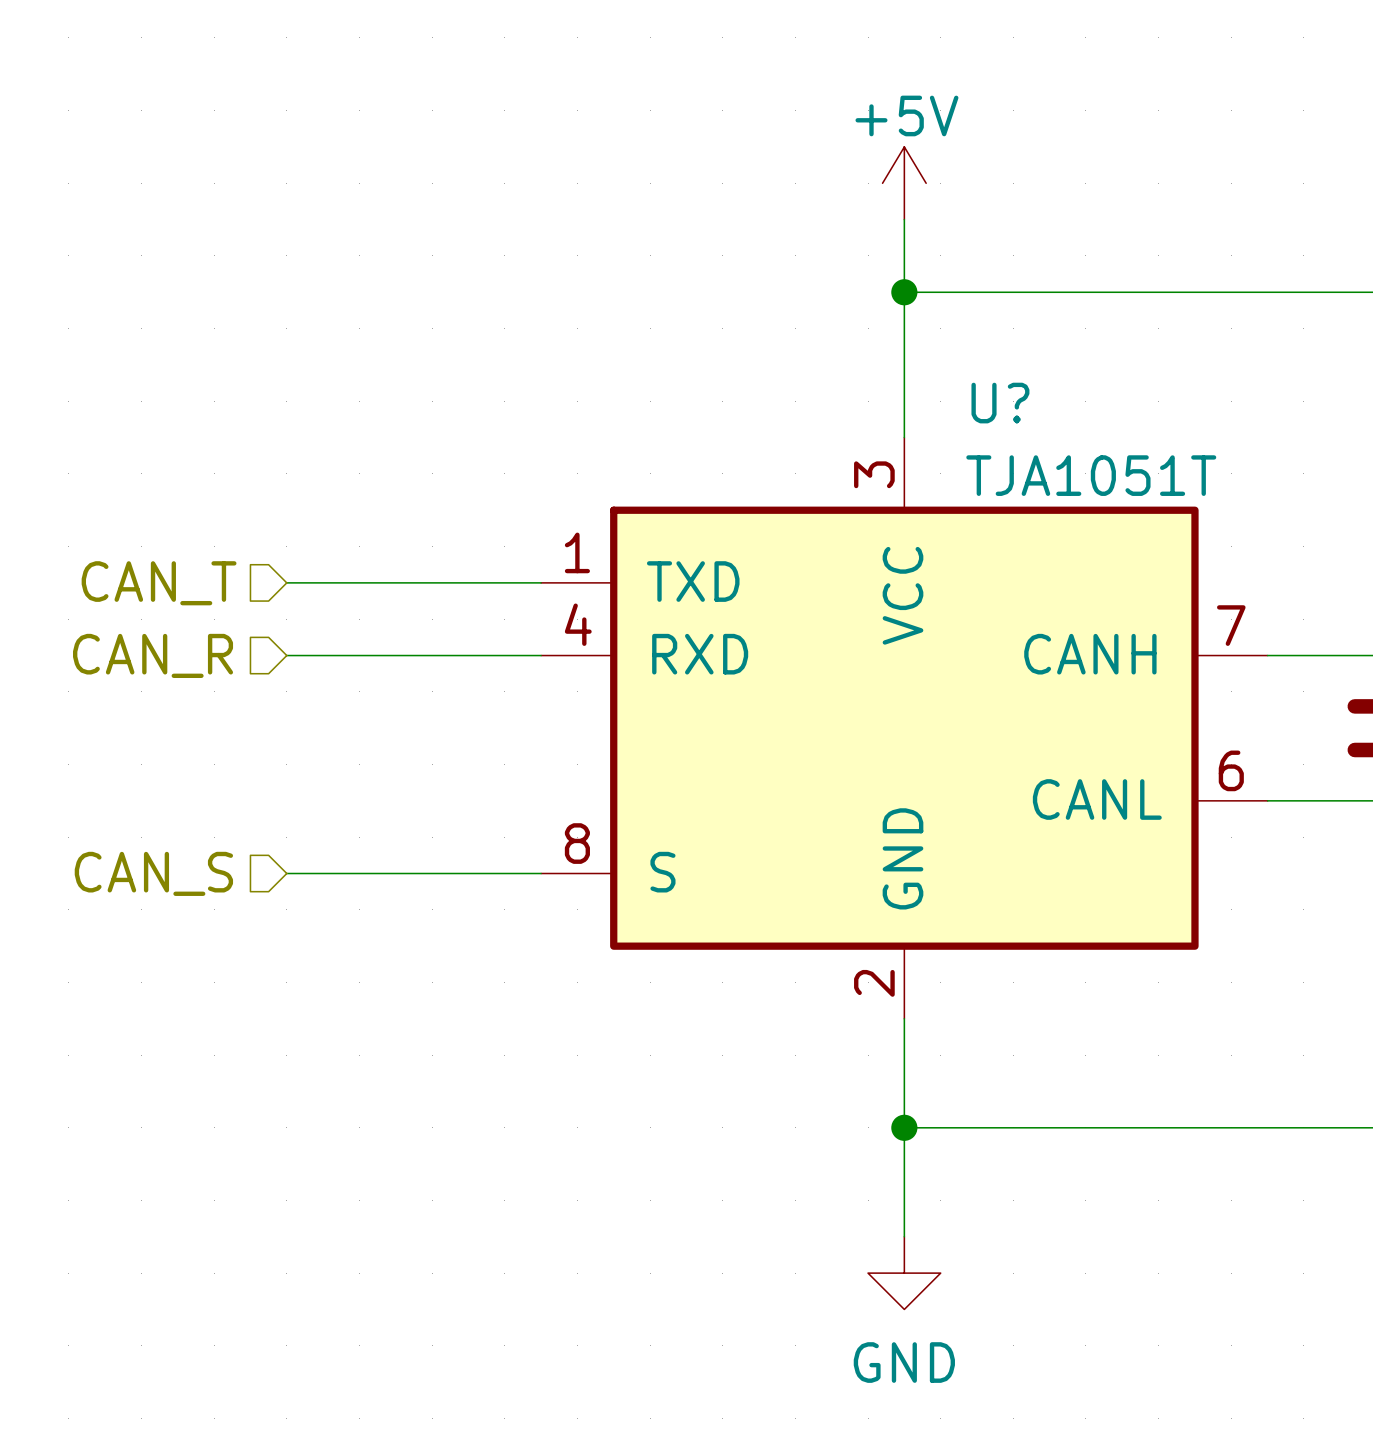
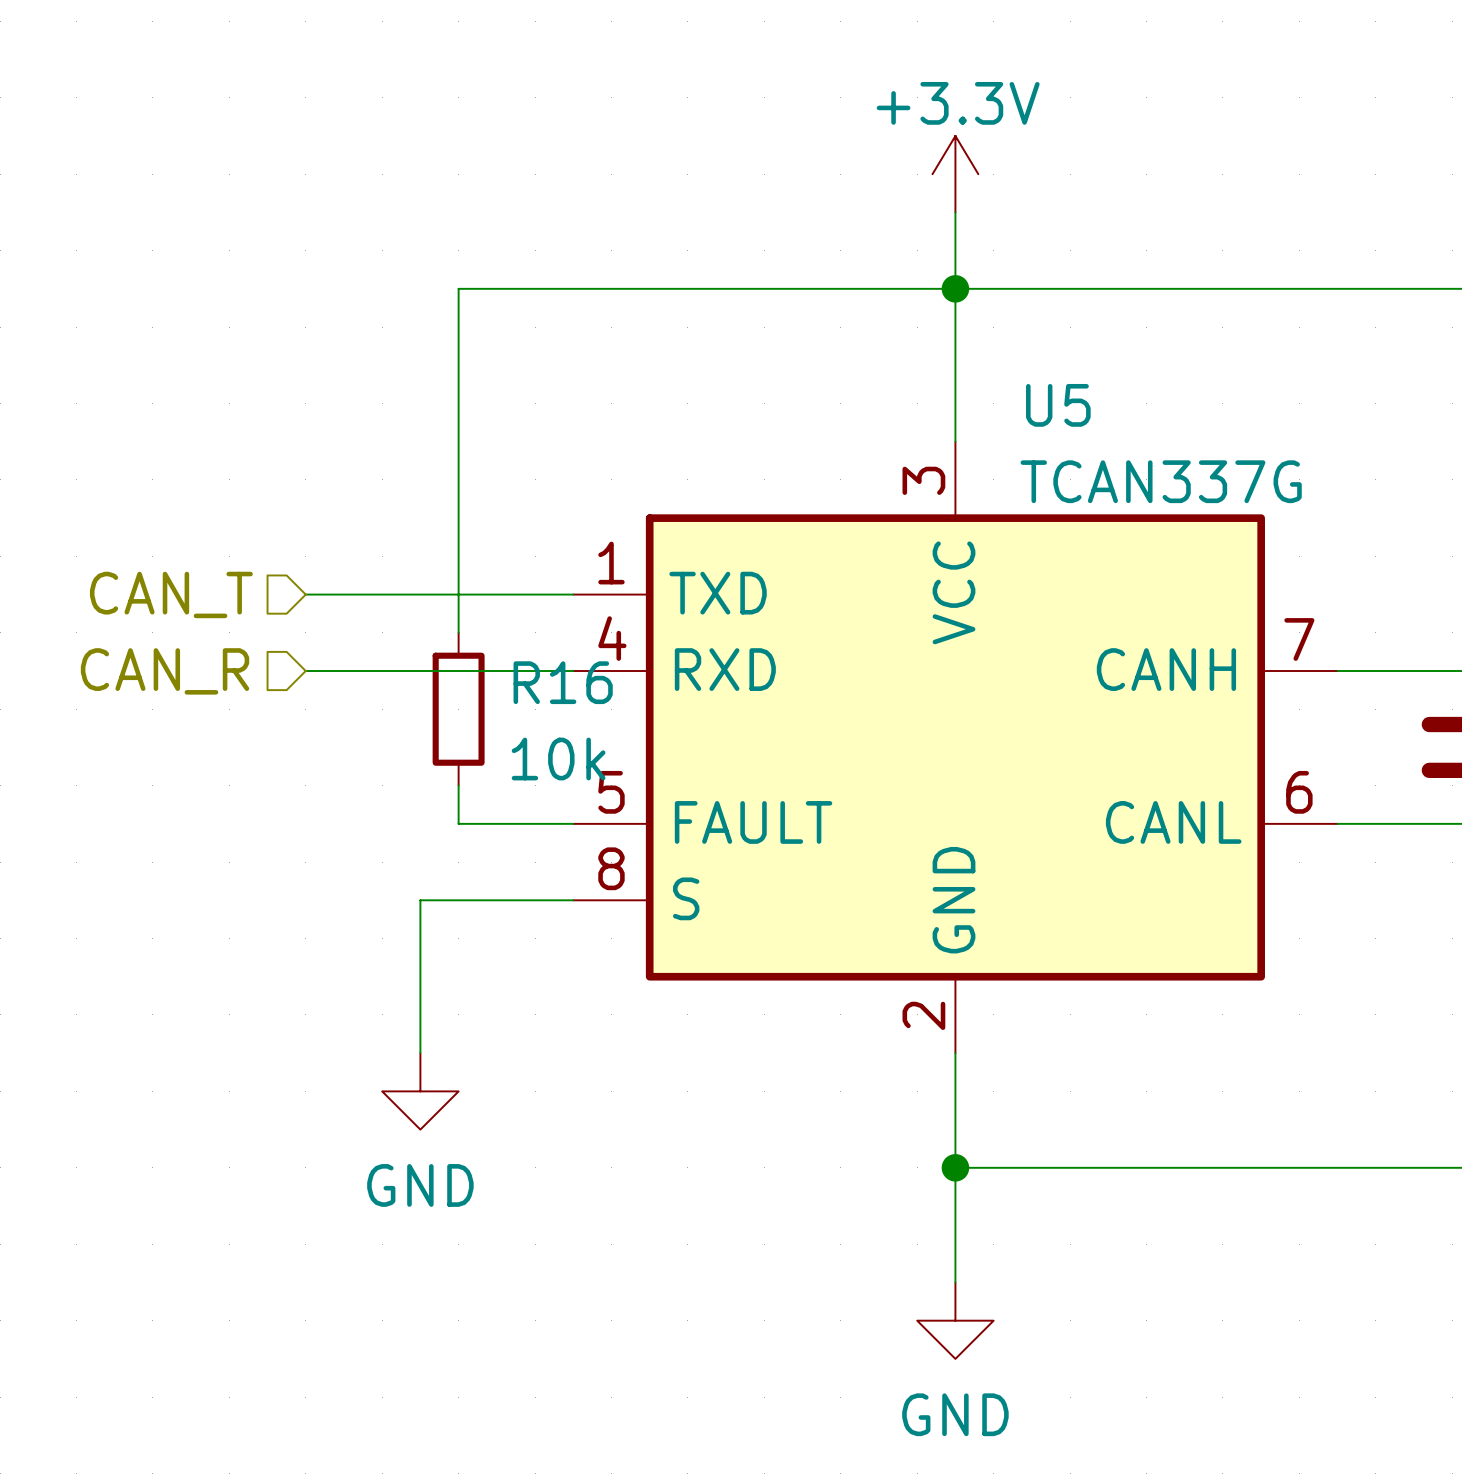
power symbol: +5V (904, 183) -> +3.3V (955, 174)
wire: none -> (955, 288) (458, 288) (458, 632)
R16: none -> 10k (458, 709)
U?: TJA1051T (904, 728) -> none
U5: none -> TCAN337G (955, 747)
wire: none -> (458, 785) (458, 823) (573, 823)
hierarchical label: CAN_S (153, 873) -> none
wire: (286, 873) (395, 873) -> (420, 1053) (420, 900)
power symbol: none -> GND (420, 1091)

